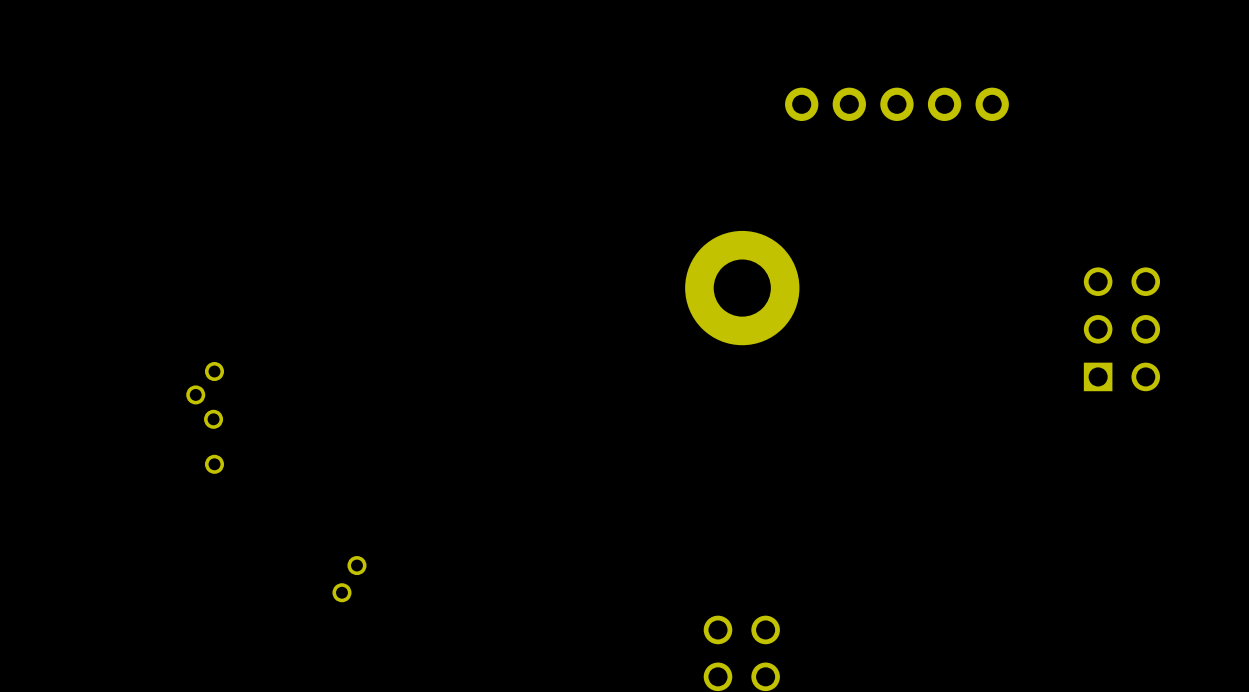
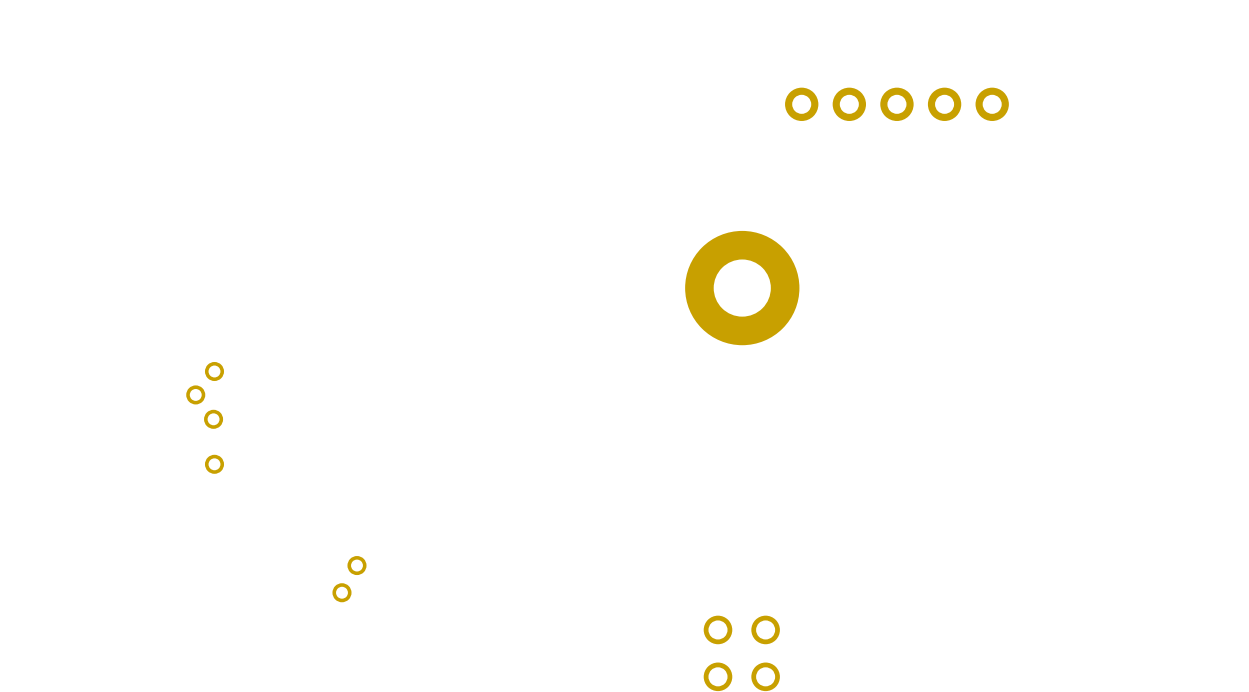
part: (1121, 329) -> none

